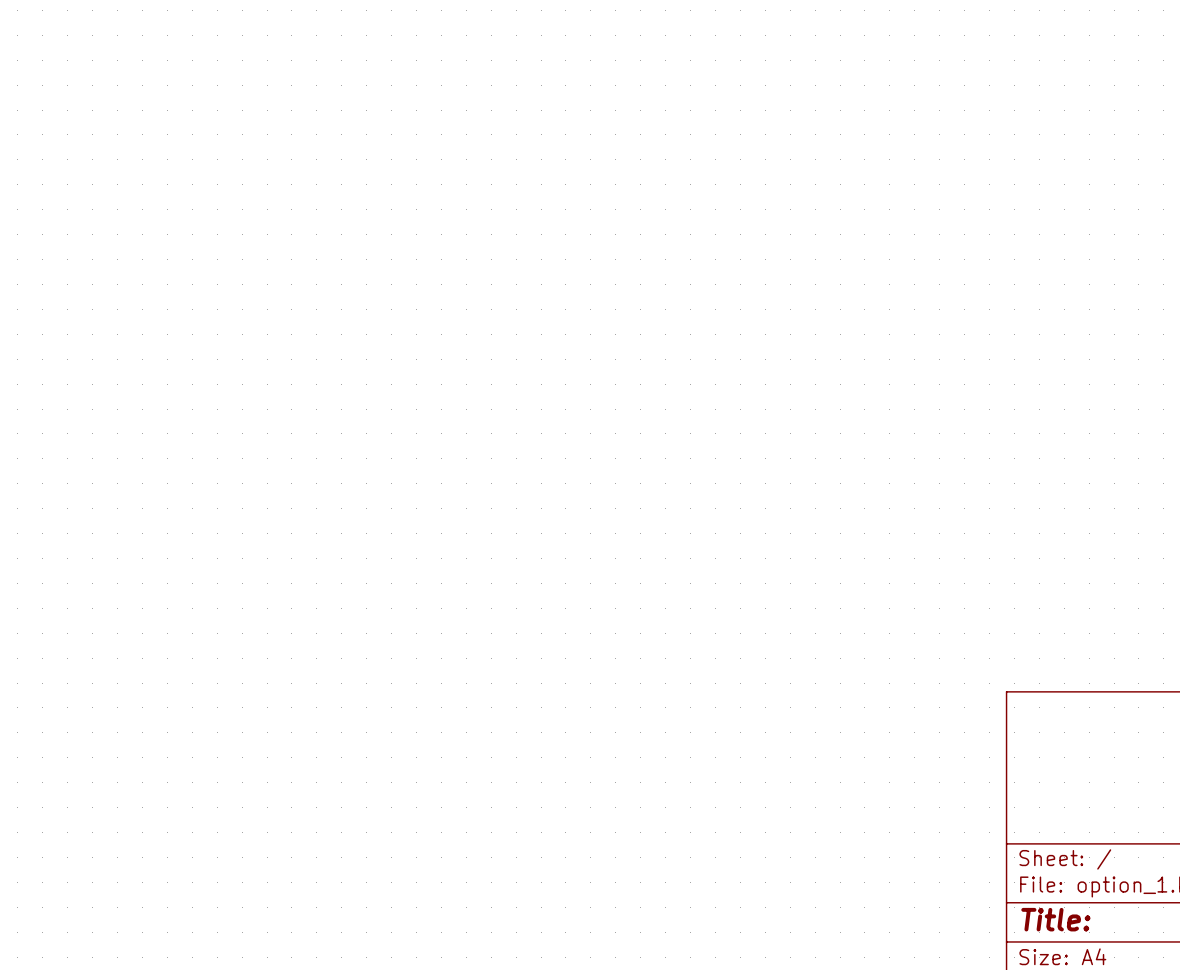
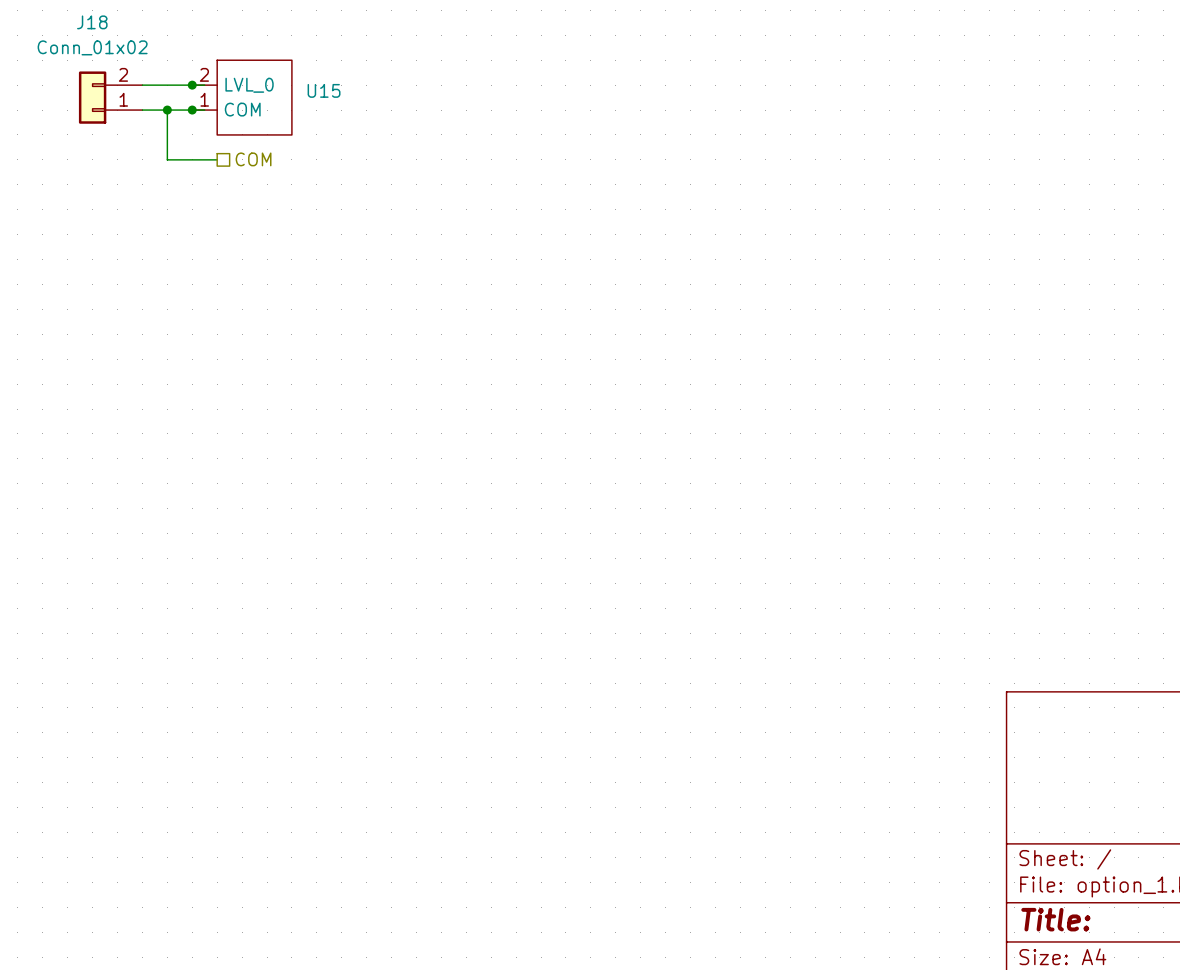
wire: none -> (142, 85) (204, 85)
junction: none -> (192, 85)
J18: none -> Conn_01x02 (110, 97)
U15: none -> (242, 97)
wire: none -> (142, 110) (204, 110)
wire: none -> (167, 110) (167, 159) (217, 159)
junction: none -> (167, 110)
junction: none -> (192, 110)
hierarchical label: none -> COM (253, 159)

